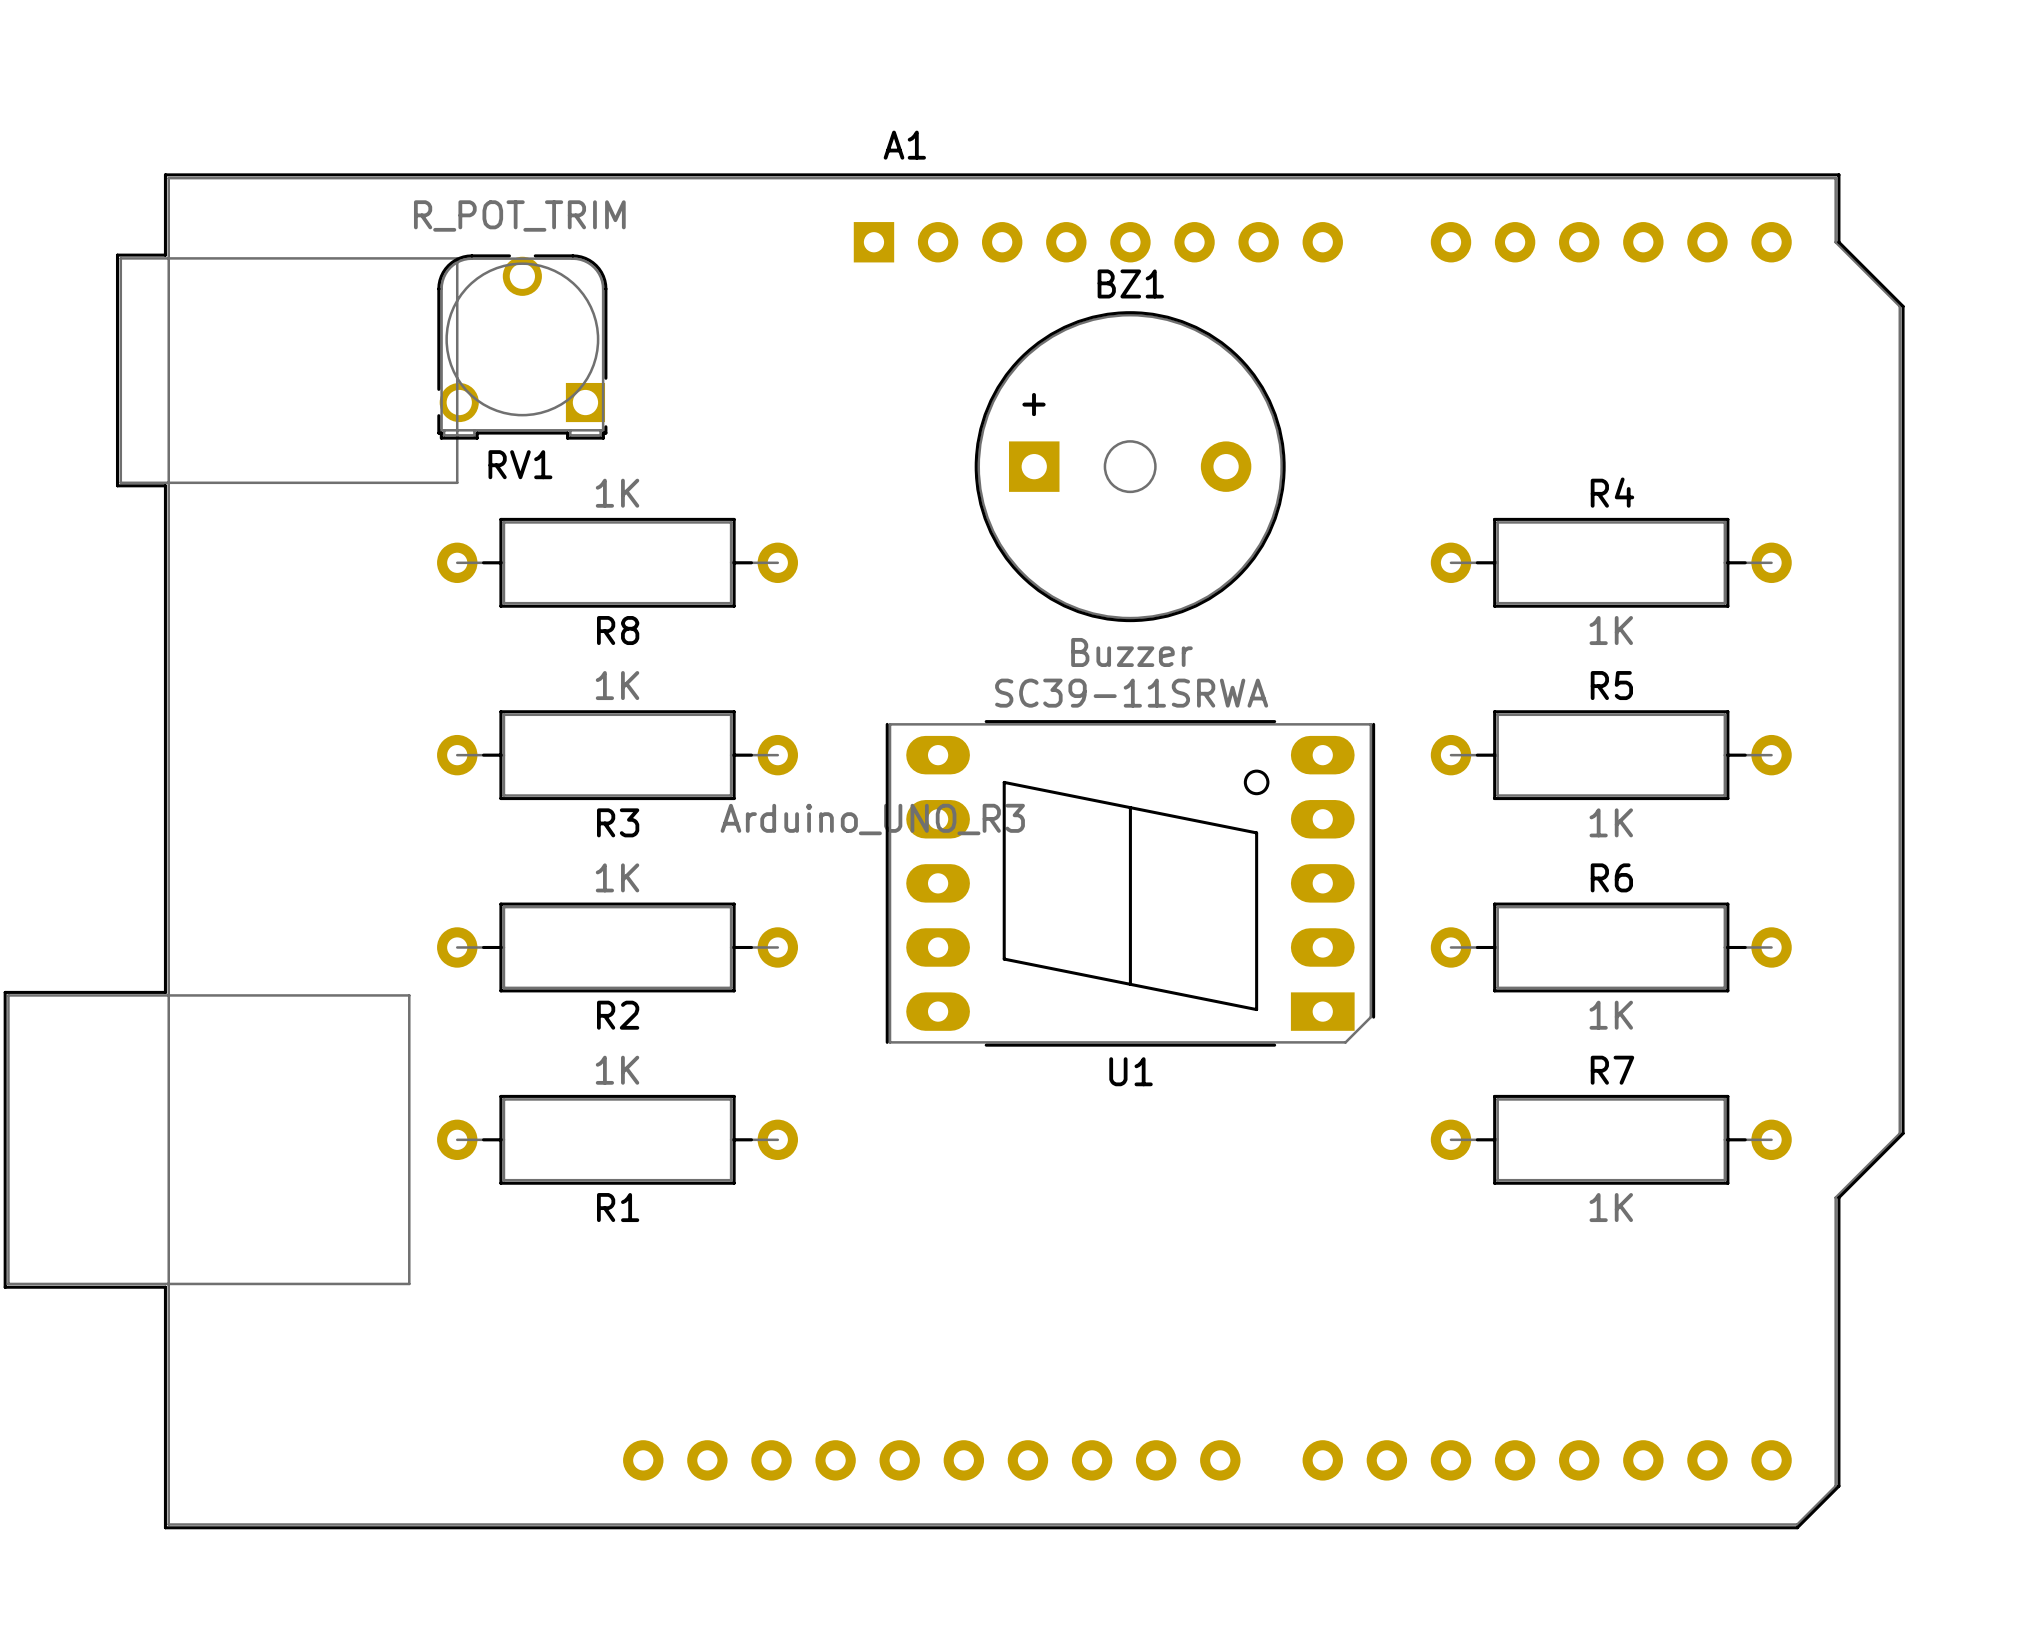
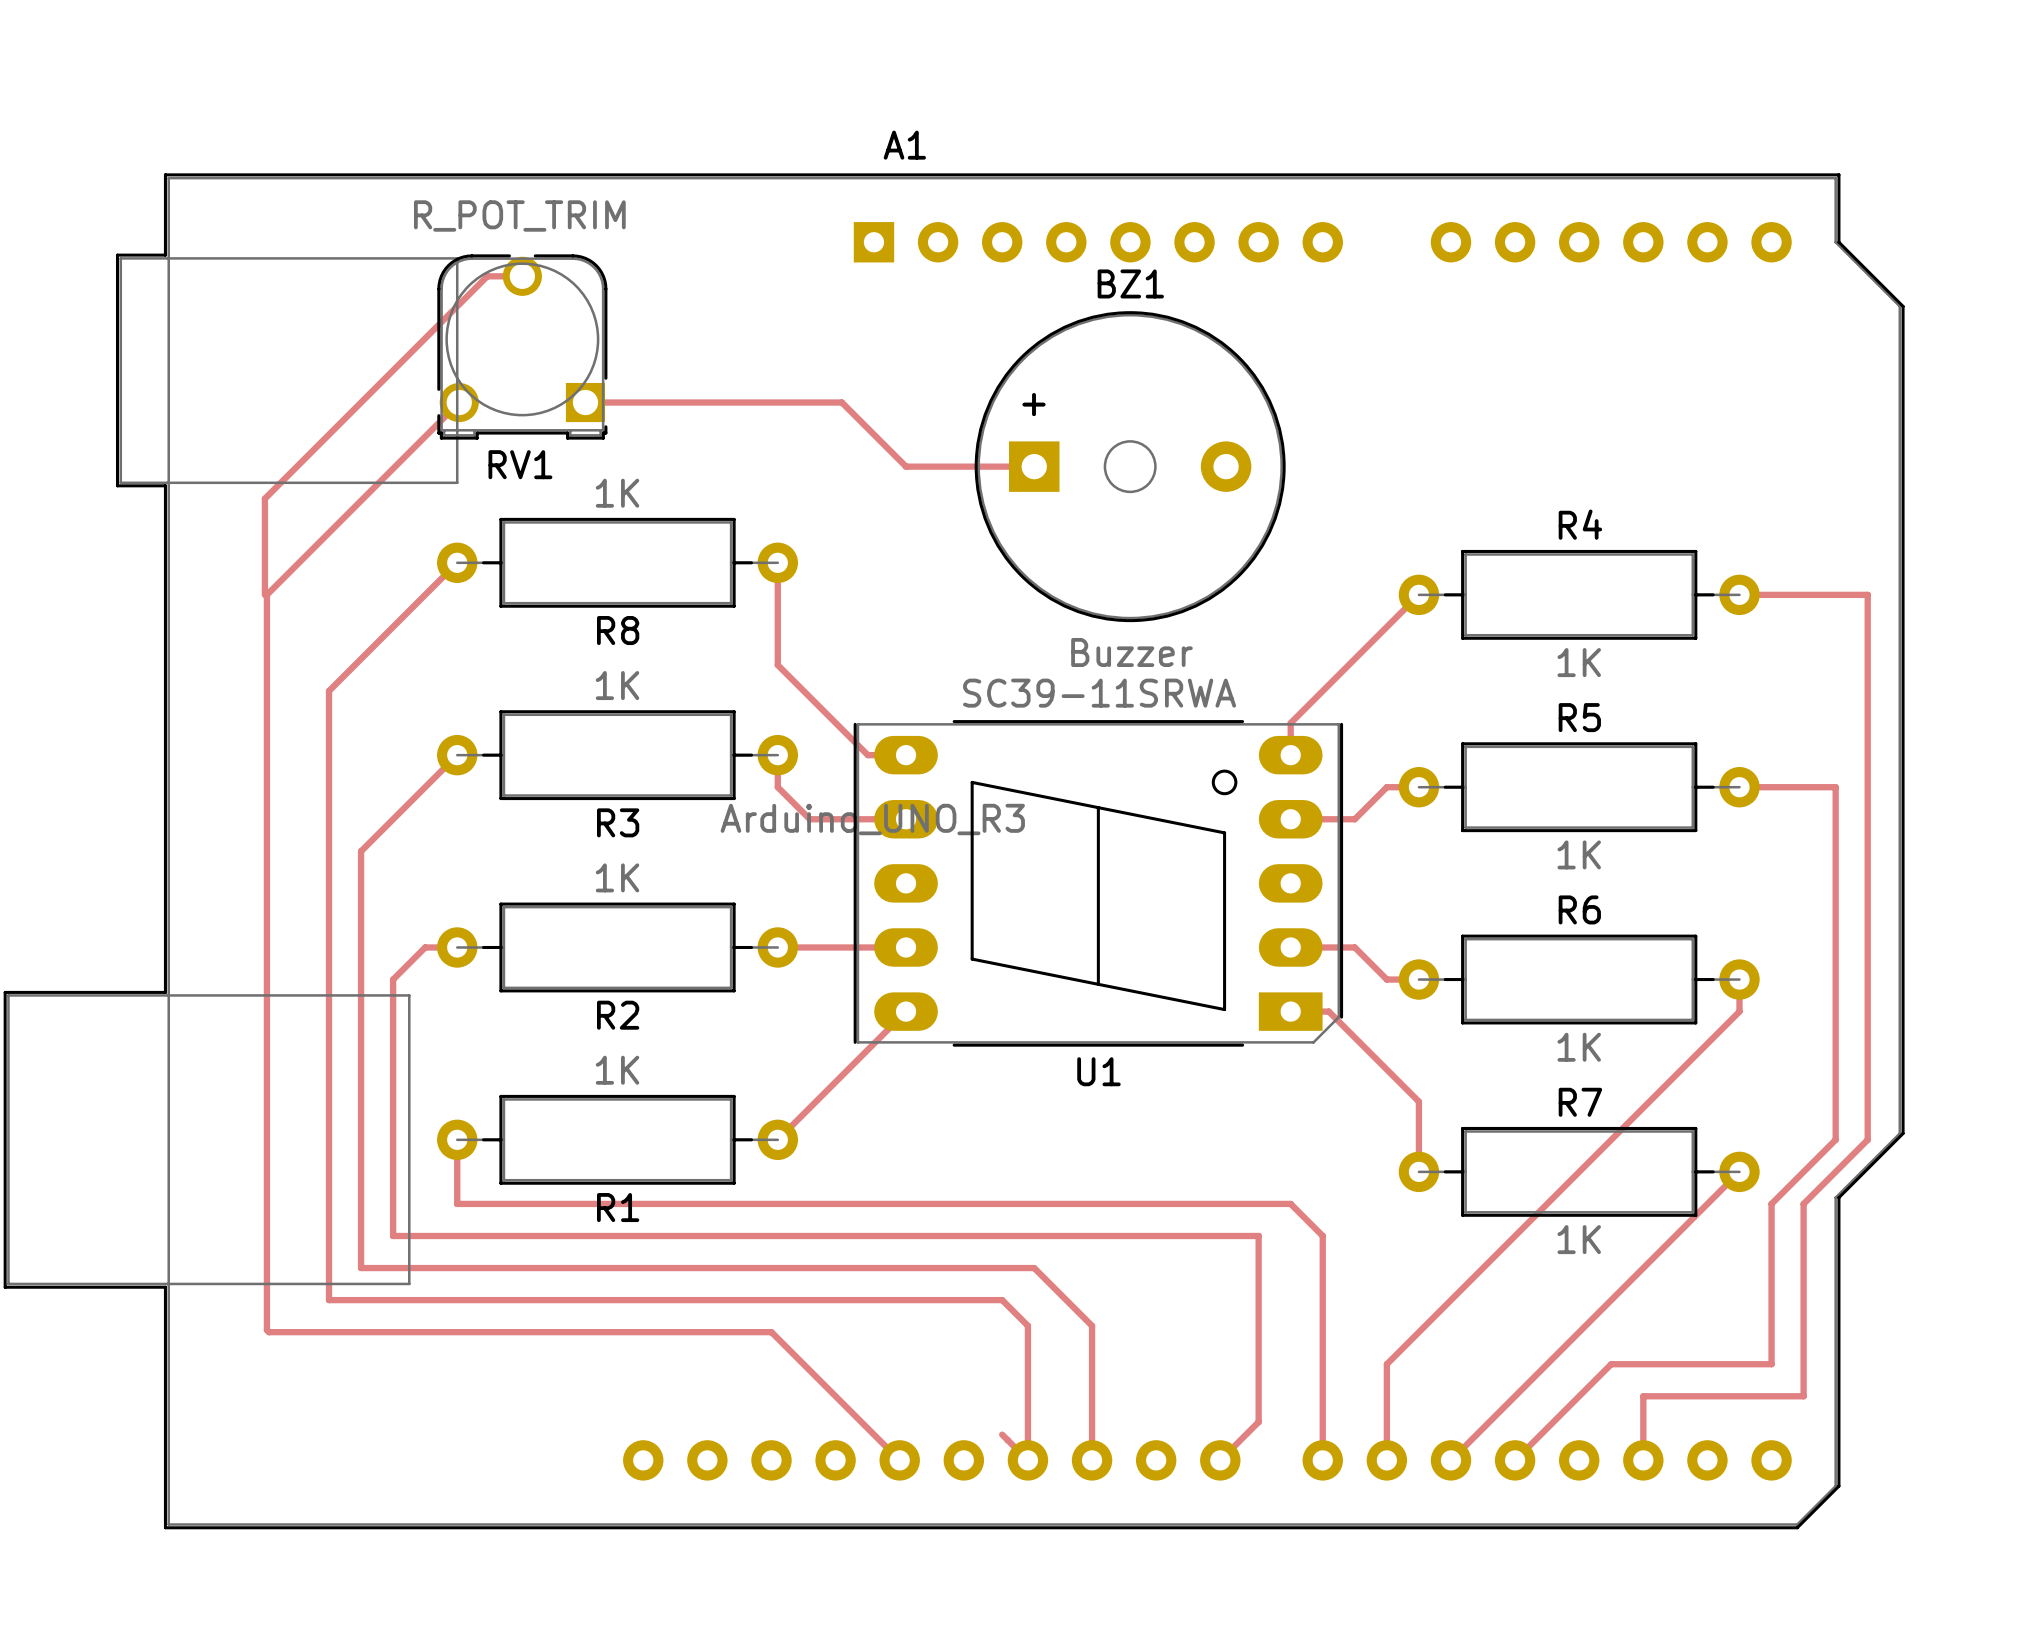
track: none -> (522, 276) (487, 276) (264, 498) (264, 594)
track: none -> (459, 402) (266, 594) (266, 1330) (268, 1332) (771, 1332) (899, 1460)
track: none -> (585, 402) (841, 402) (906, 466) (1034, 466)
track: none -> (457, 562) (329, 691) (329, 1300) (1002, 1300) (1027, 1325) (1027, 1460) (1002, 1434)
track: none -> (777, 562) (777, 665) (867, 755) (906, 755)
R4 position: (1611, 562) -> (1579, 594)
track: none -> (1418, 594) (1290, 723) (1290, 755)
track: none -> (1739, 594) (1867, 594) (1867, 1139) (1803, 1203) (1803, 1396) (1643, 1396) (1643, 1460)
track: none -> (457, 755) (361, 851) (361, 1268) (1034, 1268) (1092, 1325) (1092, 1460)
track: none -> (777, 755) (777, 787) (809, 819) (906, 819)
R5 position: (1611, 755) -> (1579, 787)
track: none -> (1418, 787) (1386, 787) (1354, 819) (1290, 819)
track: none -> (1739, 787) (1835, 787) (1835, 1139) (1771, 1203) (1771, 1364) (1611, 1364) (1515, 1460)
U1 position: (1130, 883) -> (1098, 883)
track: none -> (457, 947) (425, 947) (393, 979) (393, 1235) (1258, 1235) (1258, 1422) (1220, 1460)
track: none -> (777, 947) (906, 947)
track: none -> (1290, 947) (1354, 947) (1386, 979) (1418, 979)
R6 position: (1611, 947) -> (1579, 979)
track: none -> (1739, 979) (1739, 1011) (1386, 1364) (1386, 1460)
track: none -> (906, 1011) (777, 1139)
track: none -> (1290, 1011) (1328, 1011) (1418, 1101) (1418, 1171)
track: none -> (457, 1139) (457, 1203) (1290, 1203) (1322, 1235) (1322, 1460)
R7 position: (1611, 1139) -> (1579, 1171)
track: none -> (1739, 1171) (1450, 1460)

